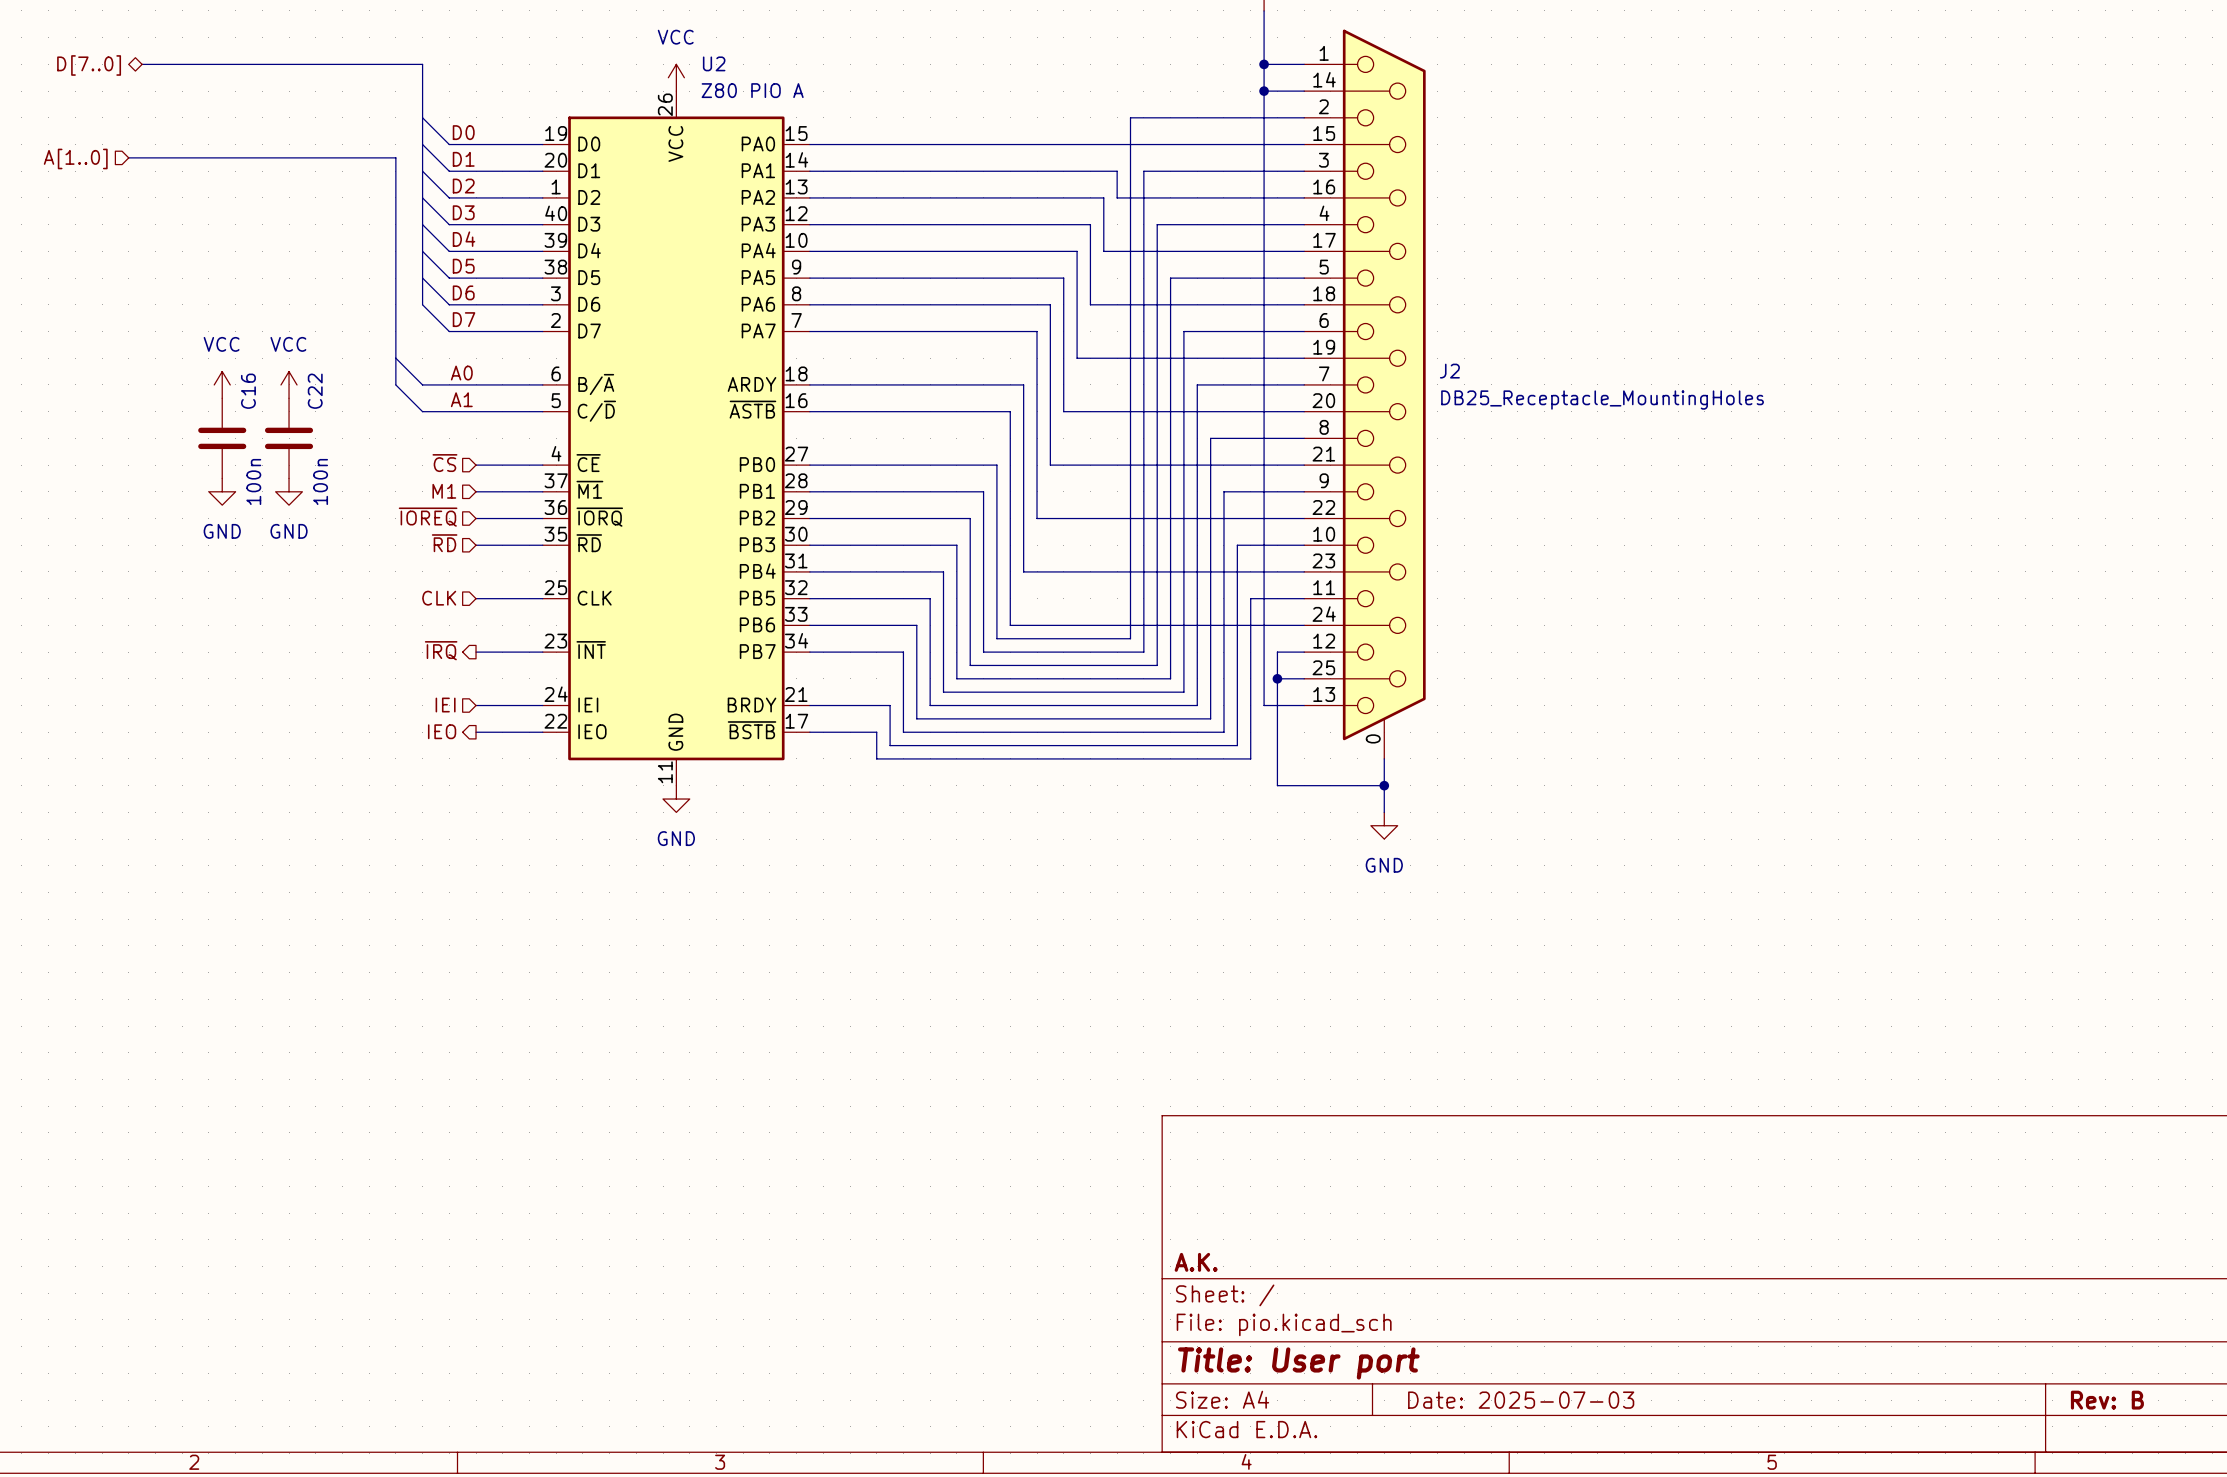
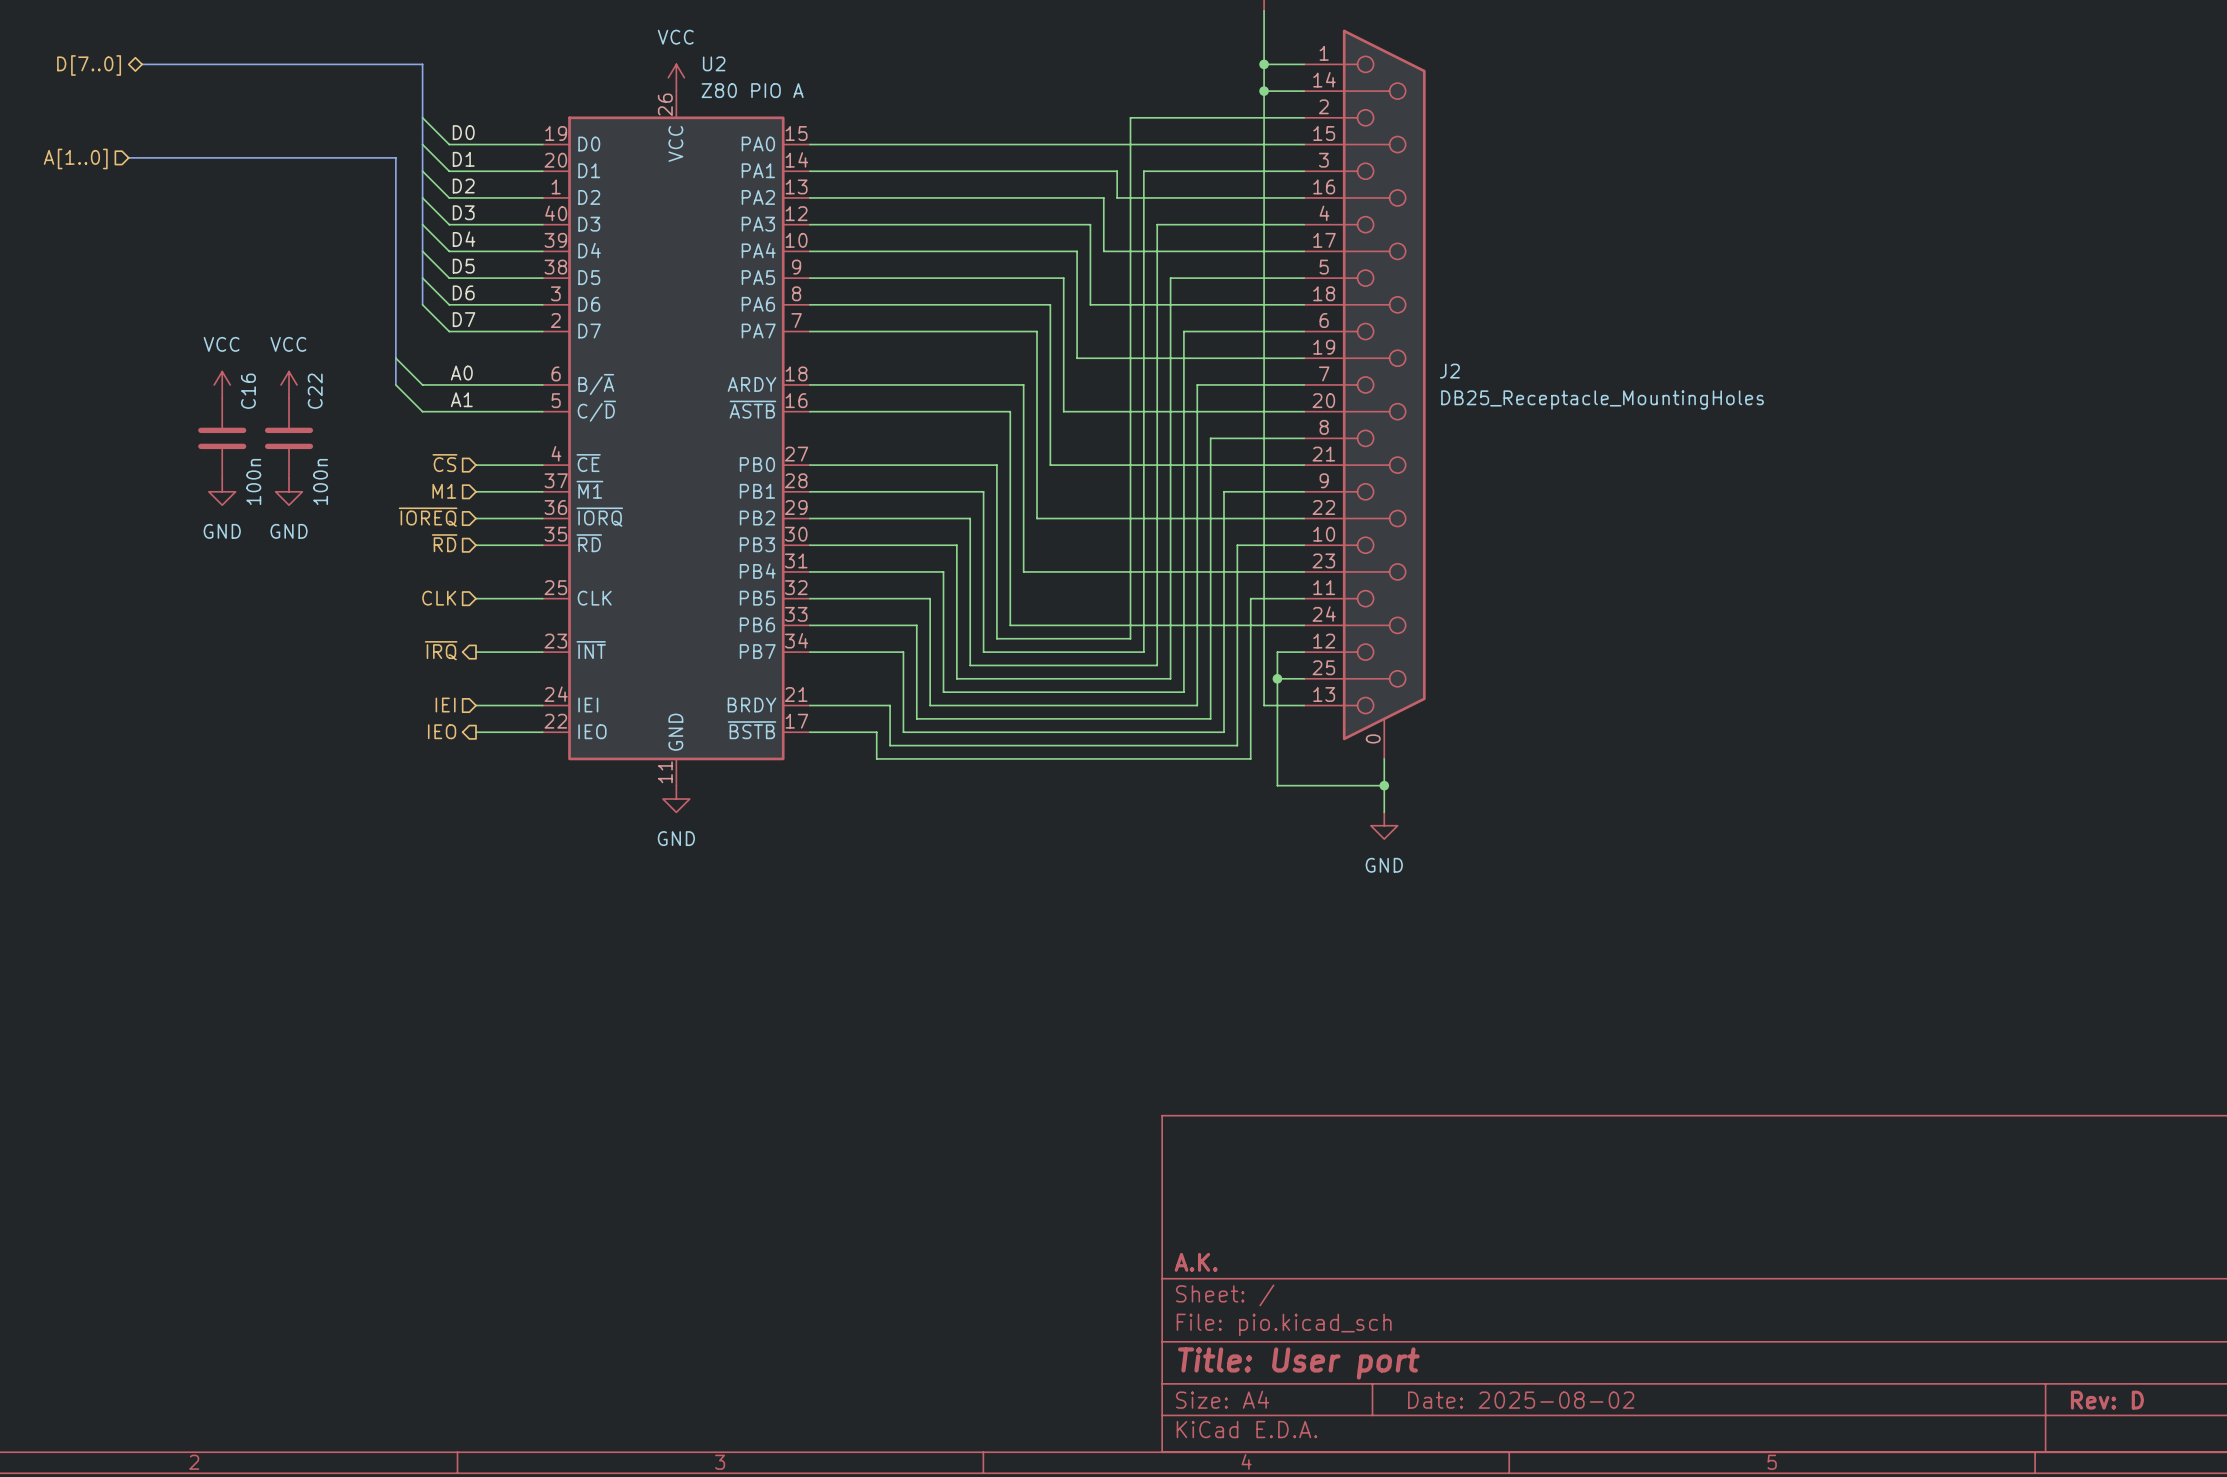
title block: Date: 2025-07-03 (1521, 1400) -> Date: 2025-08-02 (1521, 1400)
title block: Rev: B (2107, 1400) -> Rev: D (2107, 1400)

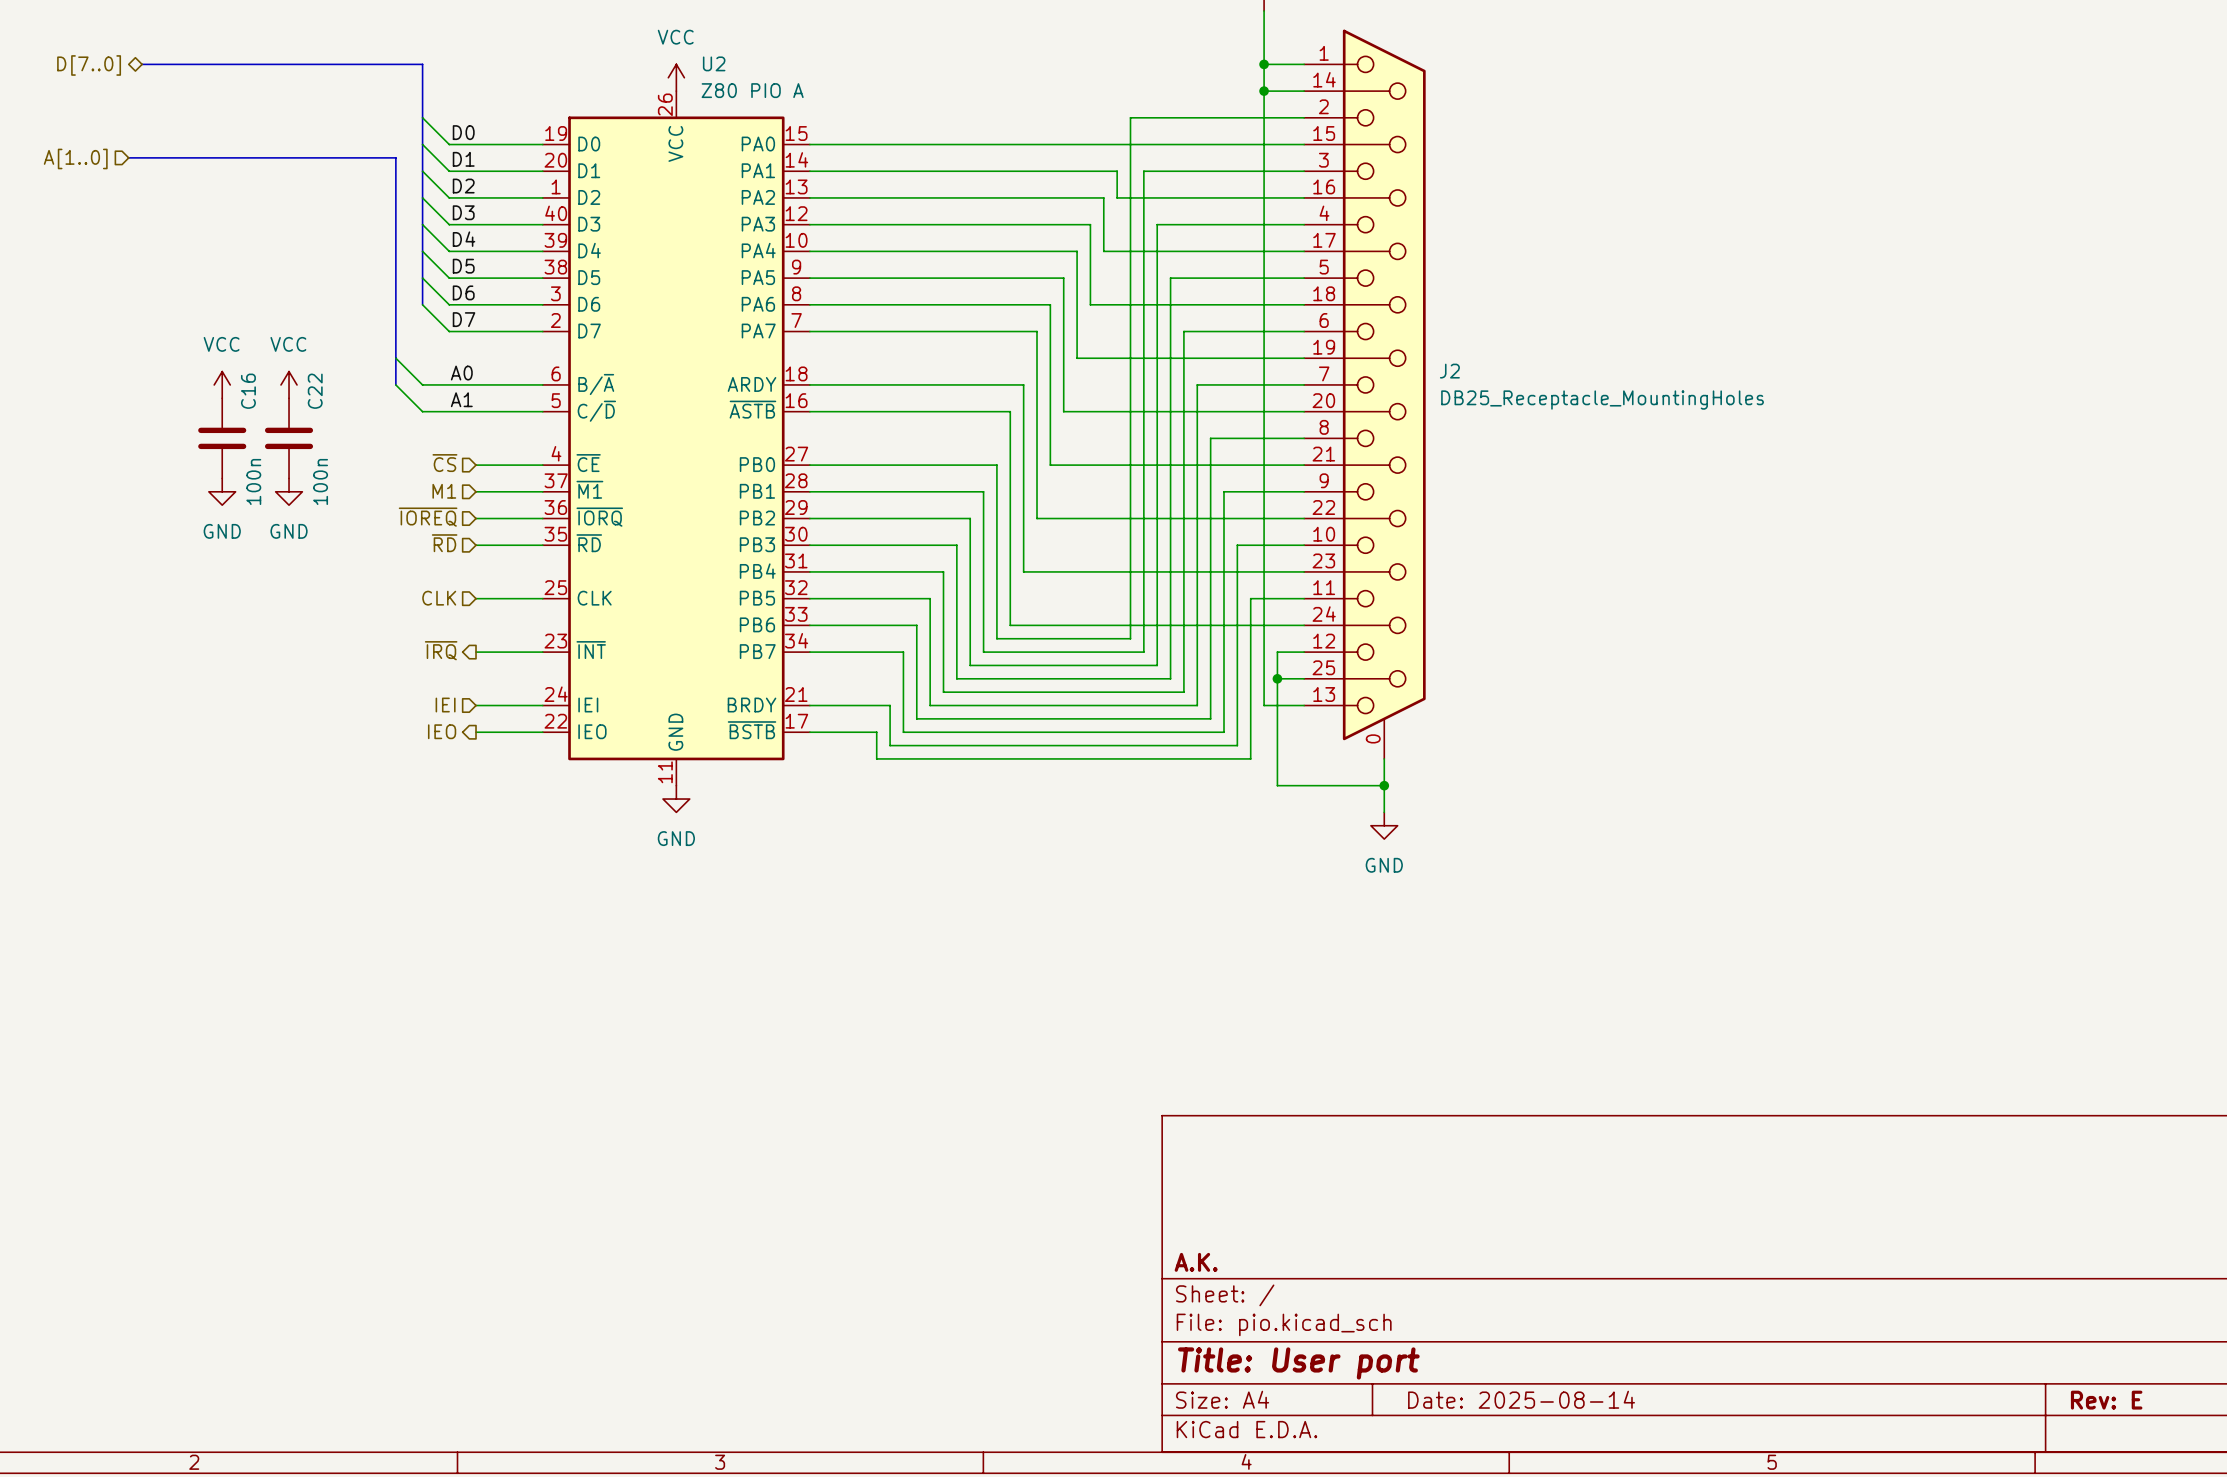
title block: Date: 2025-08-02 (1521, 1400) -> Date: 2025-08-14 (1521, 1399)
title block: Rev: D (2107, 1400) -> Rev: E (2106, 1400)

